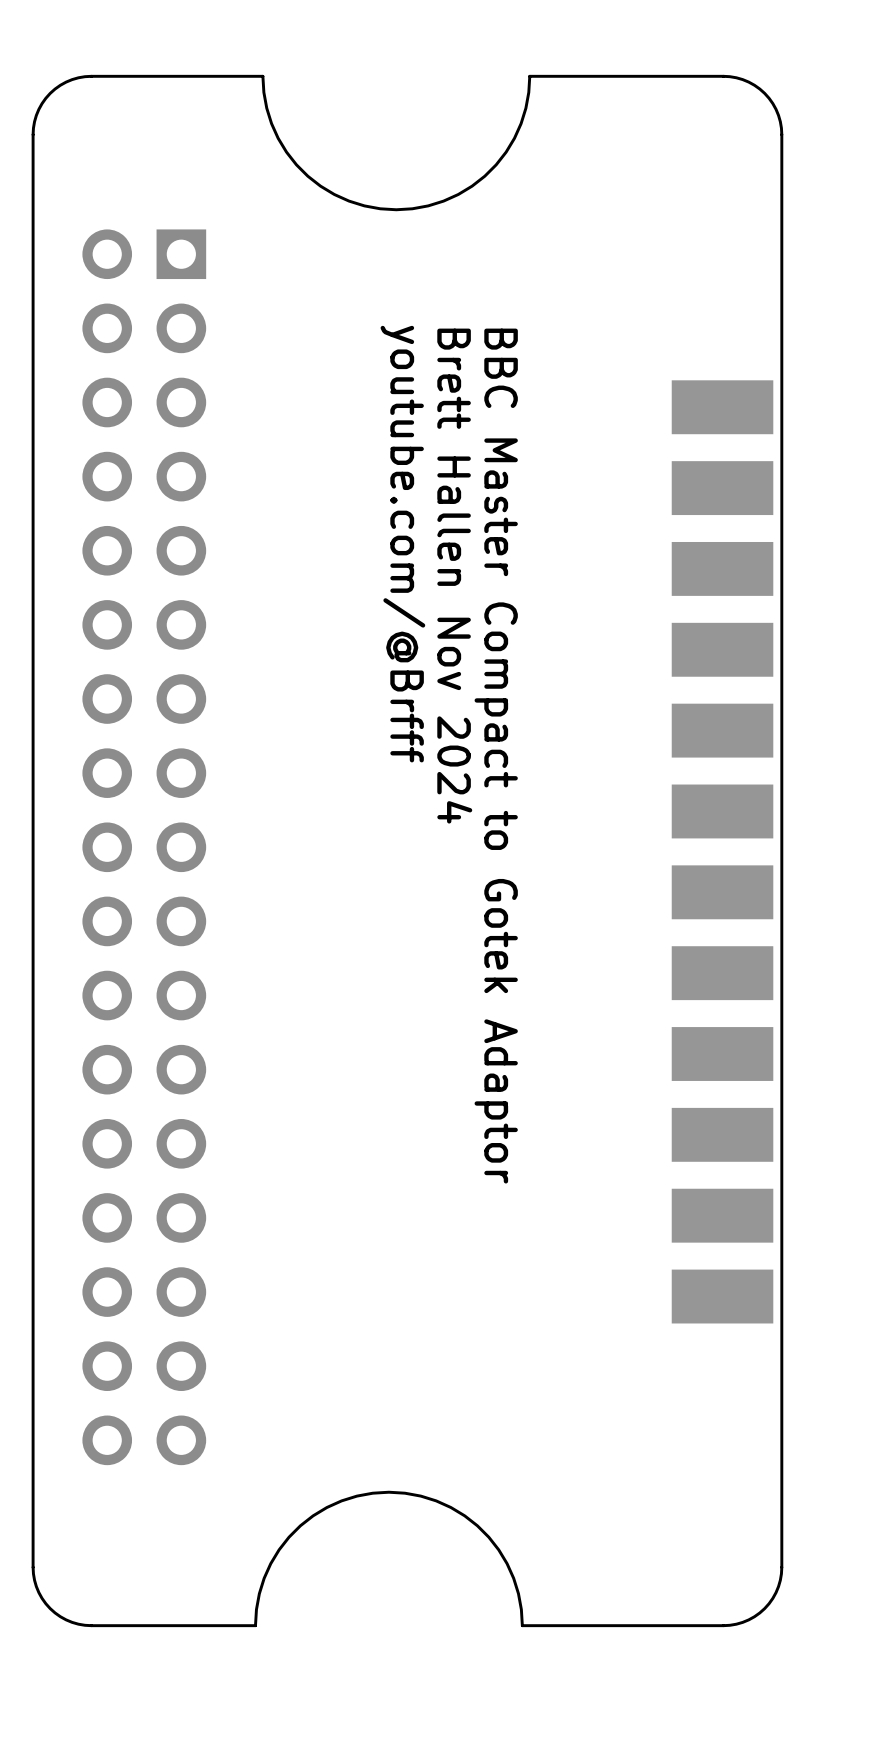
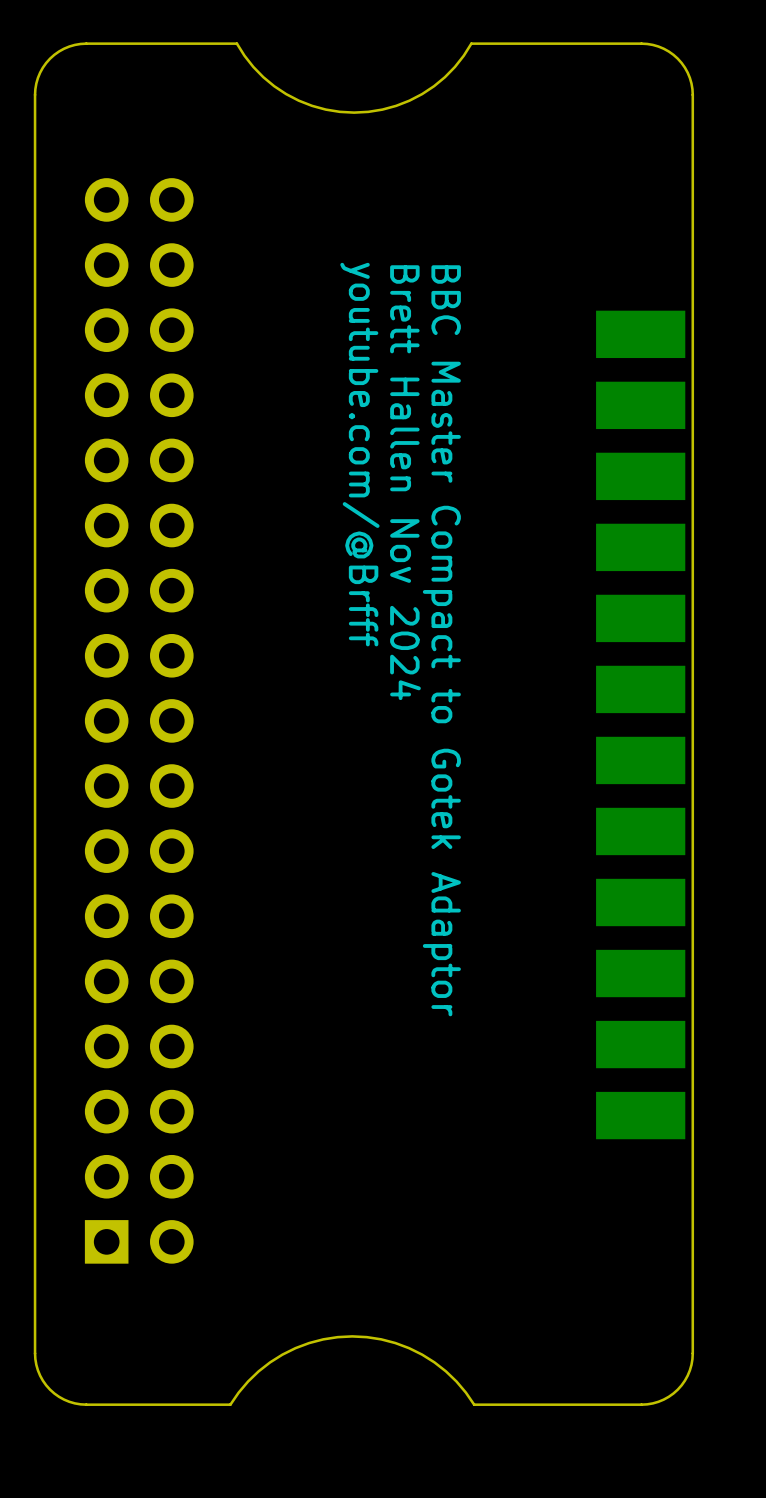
board edge: (529, 76) (528, 92) (521, 123) (514, 138) (496, 164) (472, 186) (443, 201) (412, 208) (396, 209) (364, 205) (334, 194) (320, 186) (296, 164) (286, 152) (271, 123) (266, 108) (262, 76) -> (471, 43) (454, 66) (434, 86) (422, 94) (396, 105) (368, 111) (354, 112) (339, 111) (312, 105) (286, 94) (263, 77) (253, 66) (236, 43)
part rotation: 0° (144, 847) -> 180° (139, 720)
board edge: (532, 1625) (522, 1625) (518, 1593) (507, 1563) (498, 1549) (477, 1525) (464, 1515) (436, 1500) (420, 1496) (388, 1492) (356, 1496) (341, 1500) (313, 1515) (289, 1537) (270, 1563) (264, 1578) (256, 1609) (255, 1625) -> (474, 1404) (445, 1371) (422, 1354) (395, 1343) (352, 1336) (323, 1339) (282, 1354) (248, 1381) (230, 1404)

